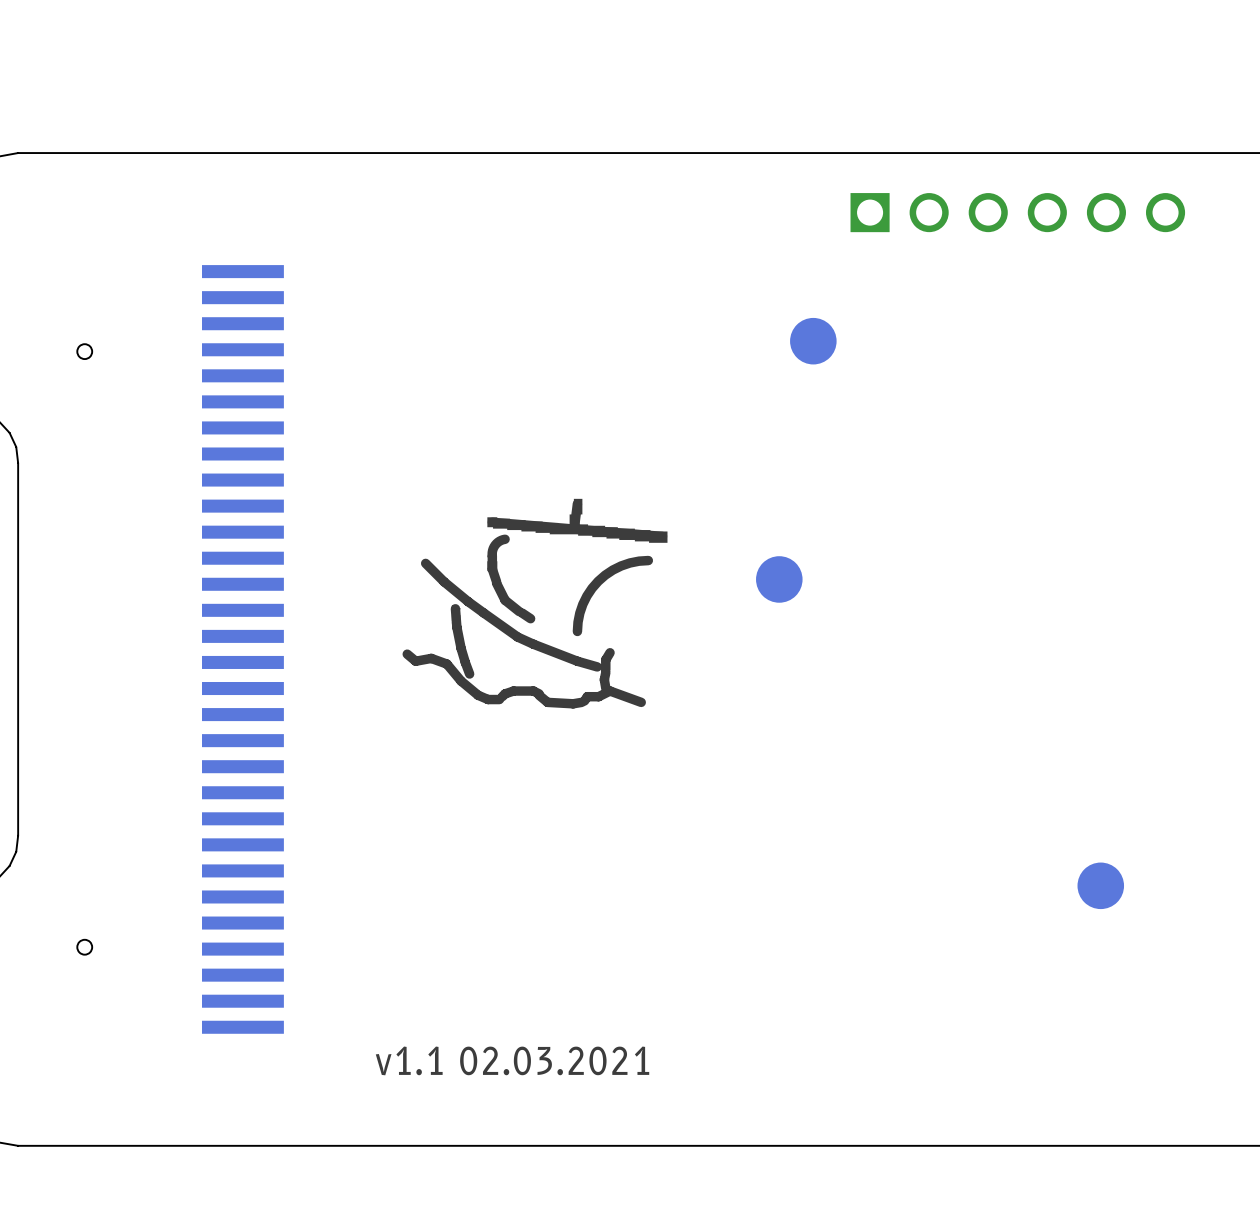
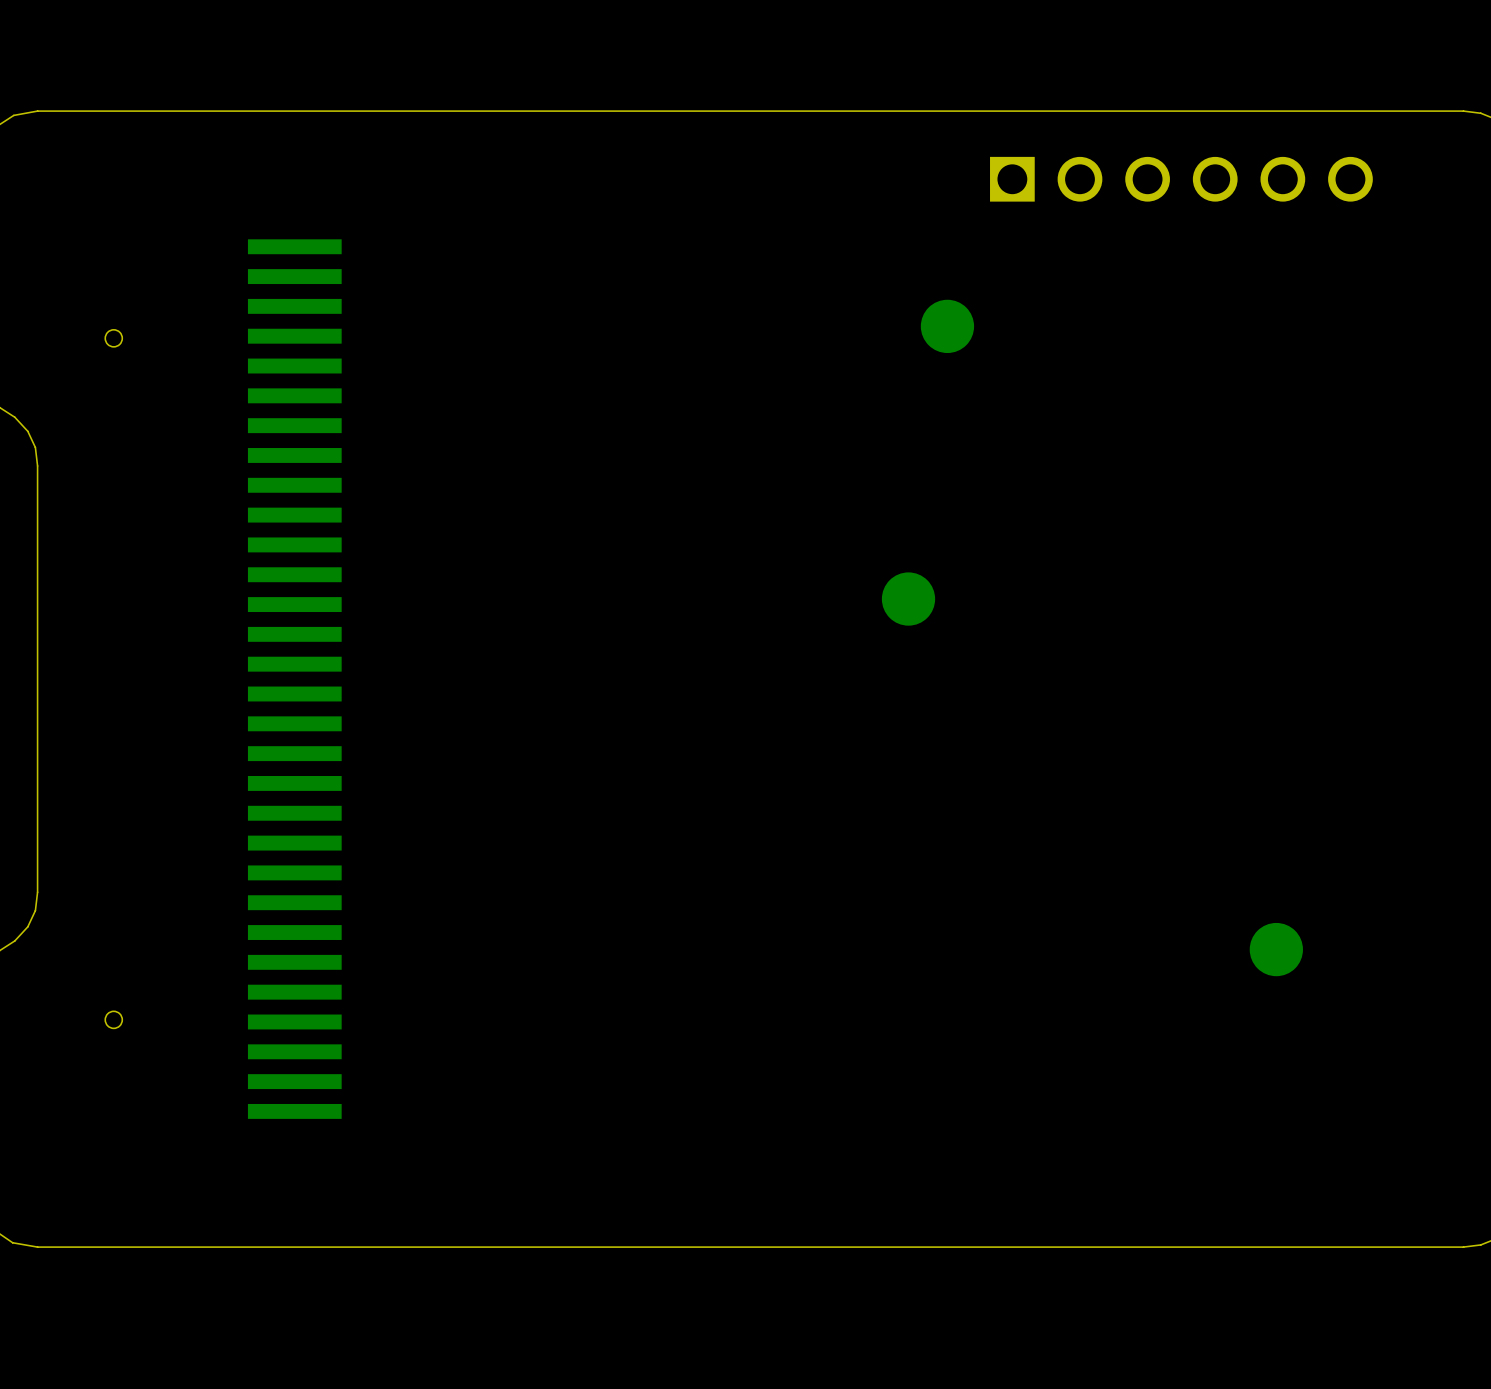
drawing: [402, 498, 668, 709] -> none
text: v1.1 02.03.2021 (512, 1060) -> none

